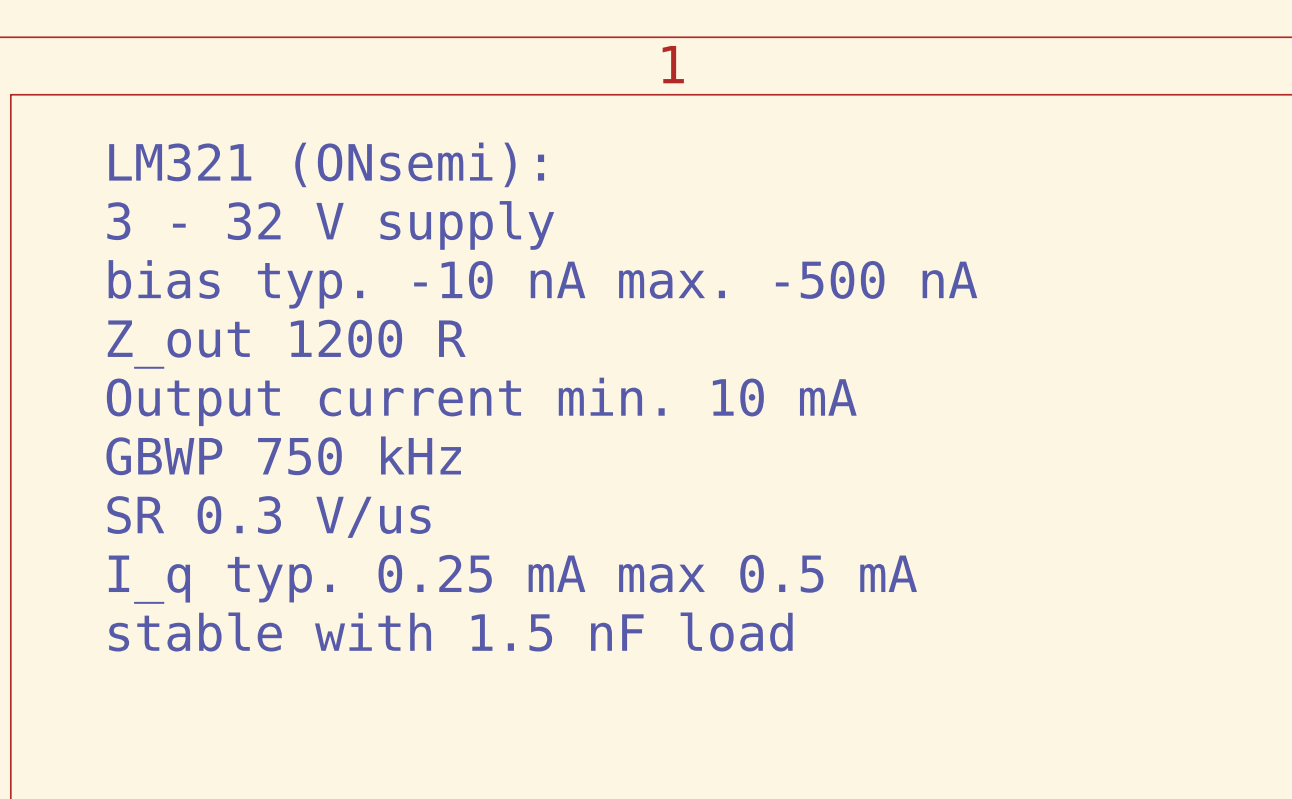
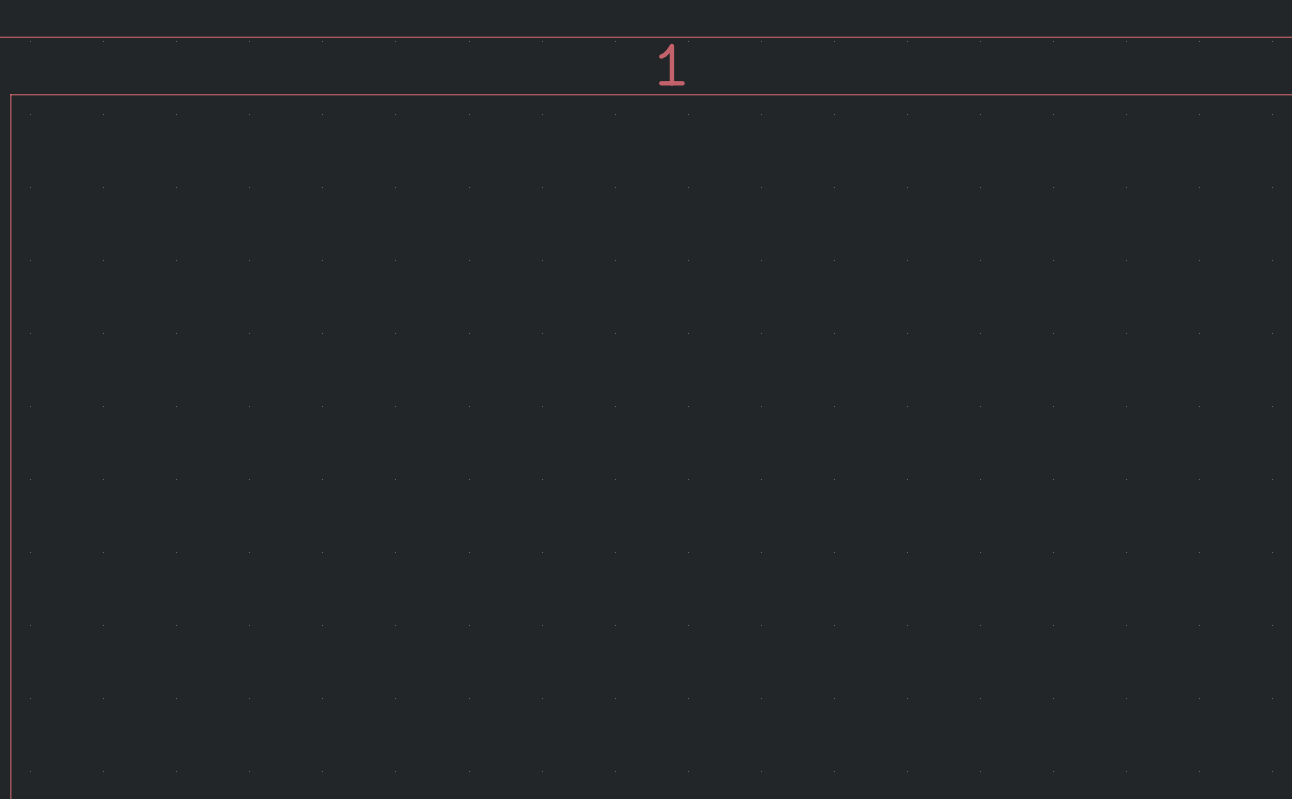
text: LM321 (ONsemi): (326, 164) -> none
text: 3 - 32 V supply (330, 225) -> none
text: bias typ. -10 nA max. -500 nA (542, 284) -> none
text: Z_out 1200 R (286, 344) -> none
text: Output current min. 10 mA (481, 401) -> none
text: GBWP 750 kHz (283, 455) -> none
text: SR 0.3 V/us (268, 517) -> none
text: I_q typ. 0.25 mA max 0.5 mA (512, 579) -> none
text: stable with 1.5 nF load (450, 632) -> none

